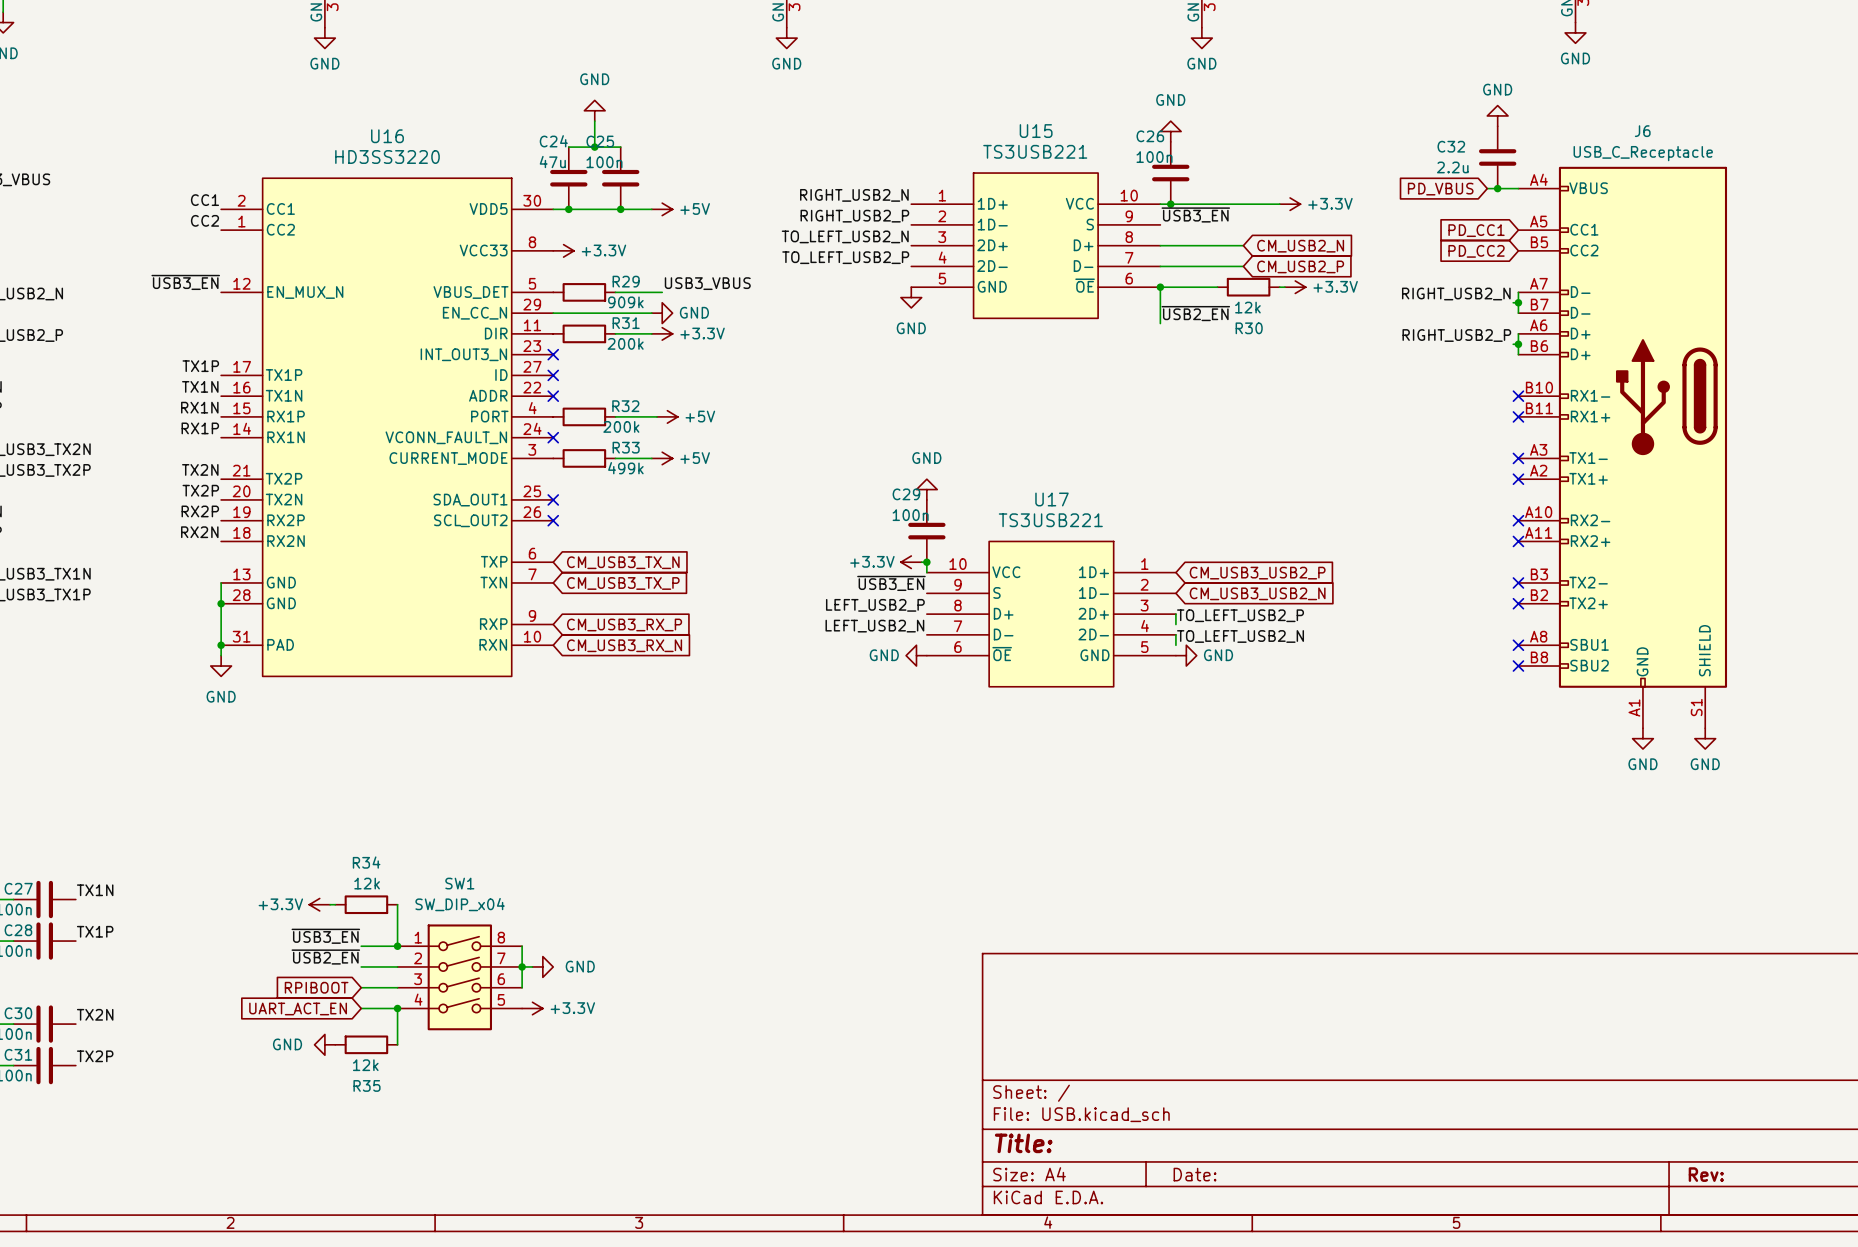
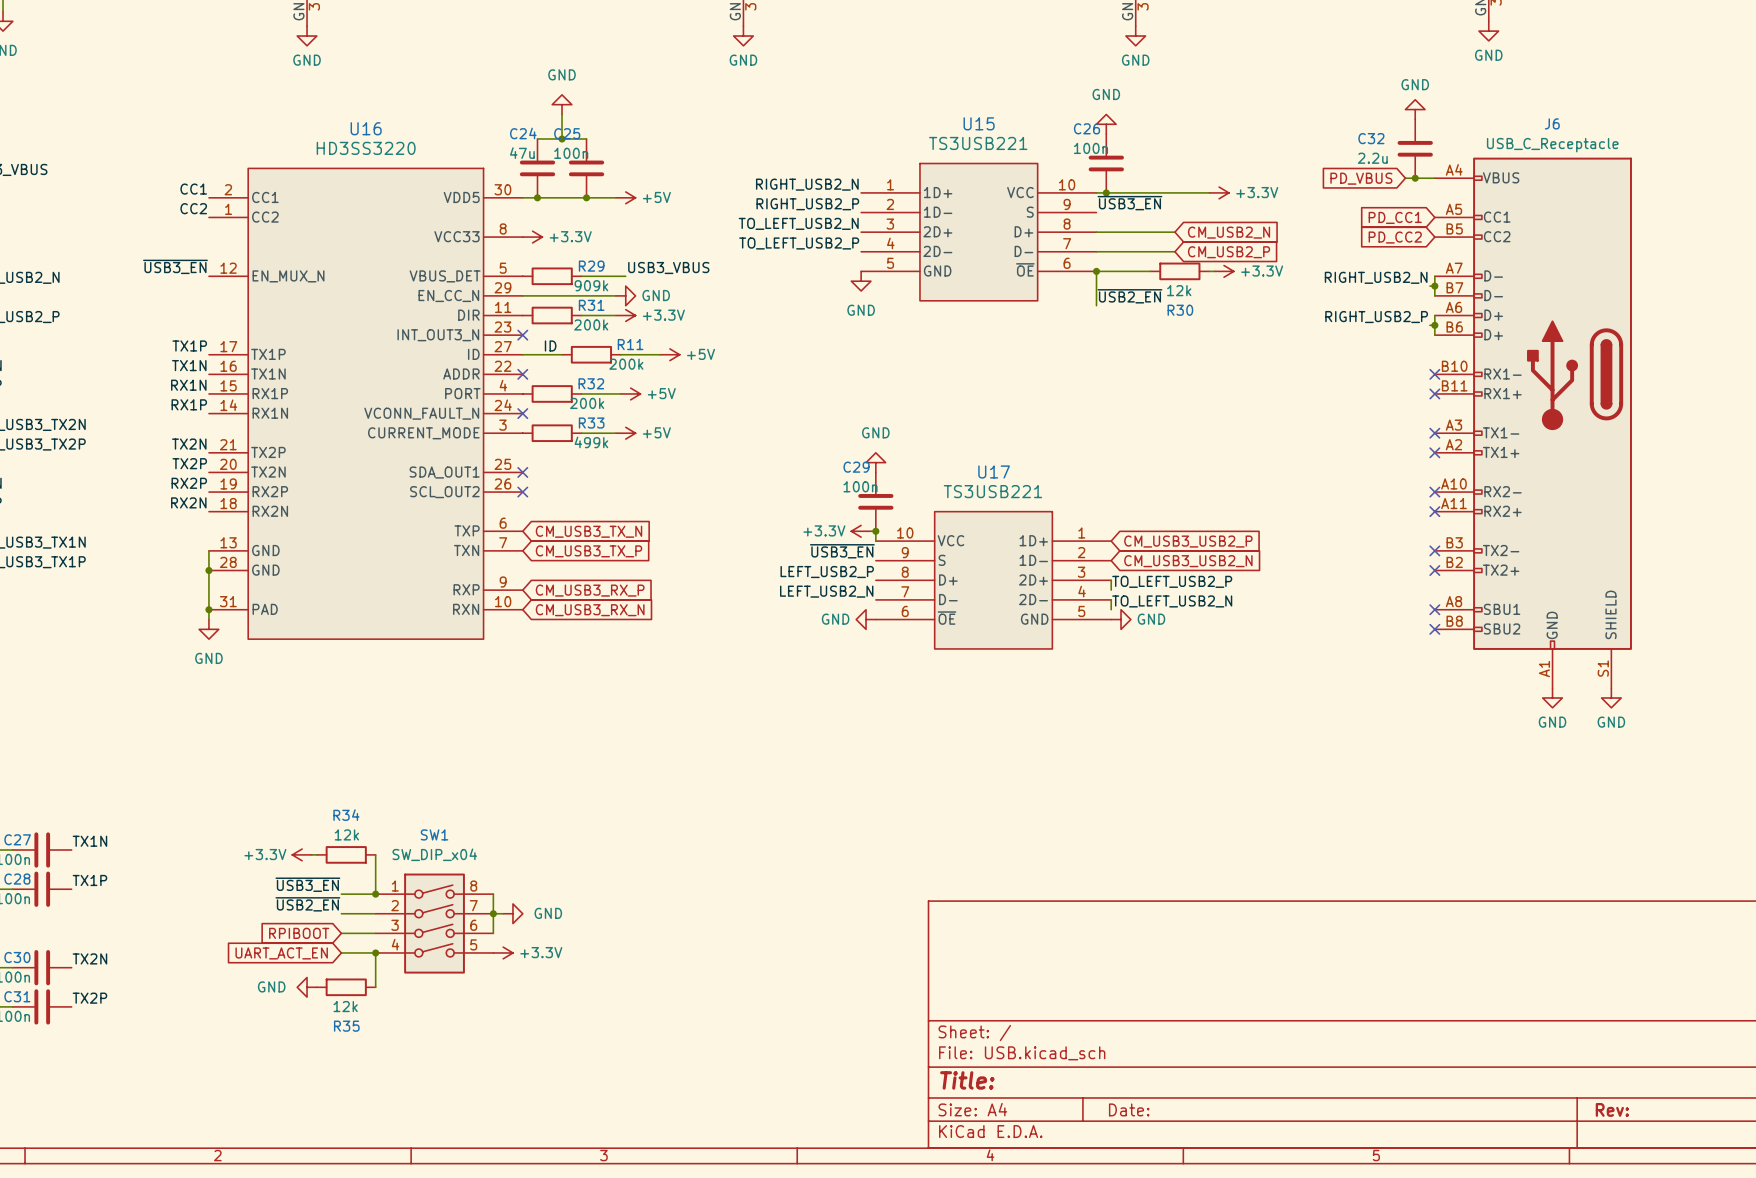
label: none -> ID (550, 345)
wire: none -> (522, 354) (562, 354)
no-connect mark: (553, 375) -> none
R11: none -> 200k (591, 354)
wire: none -> (620, 354) (660, 354)
power symbol: none -> +5V (669, 354)

